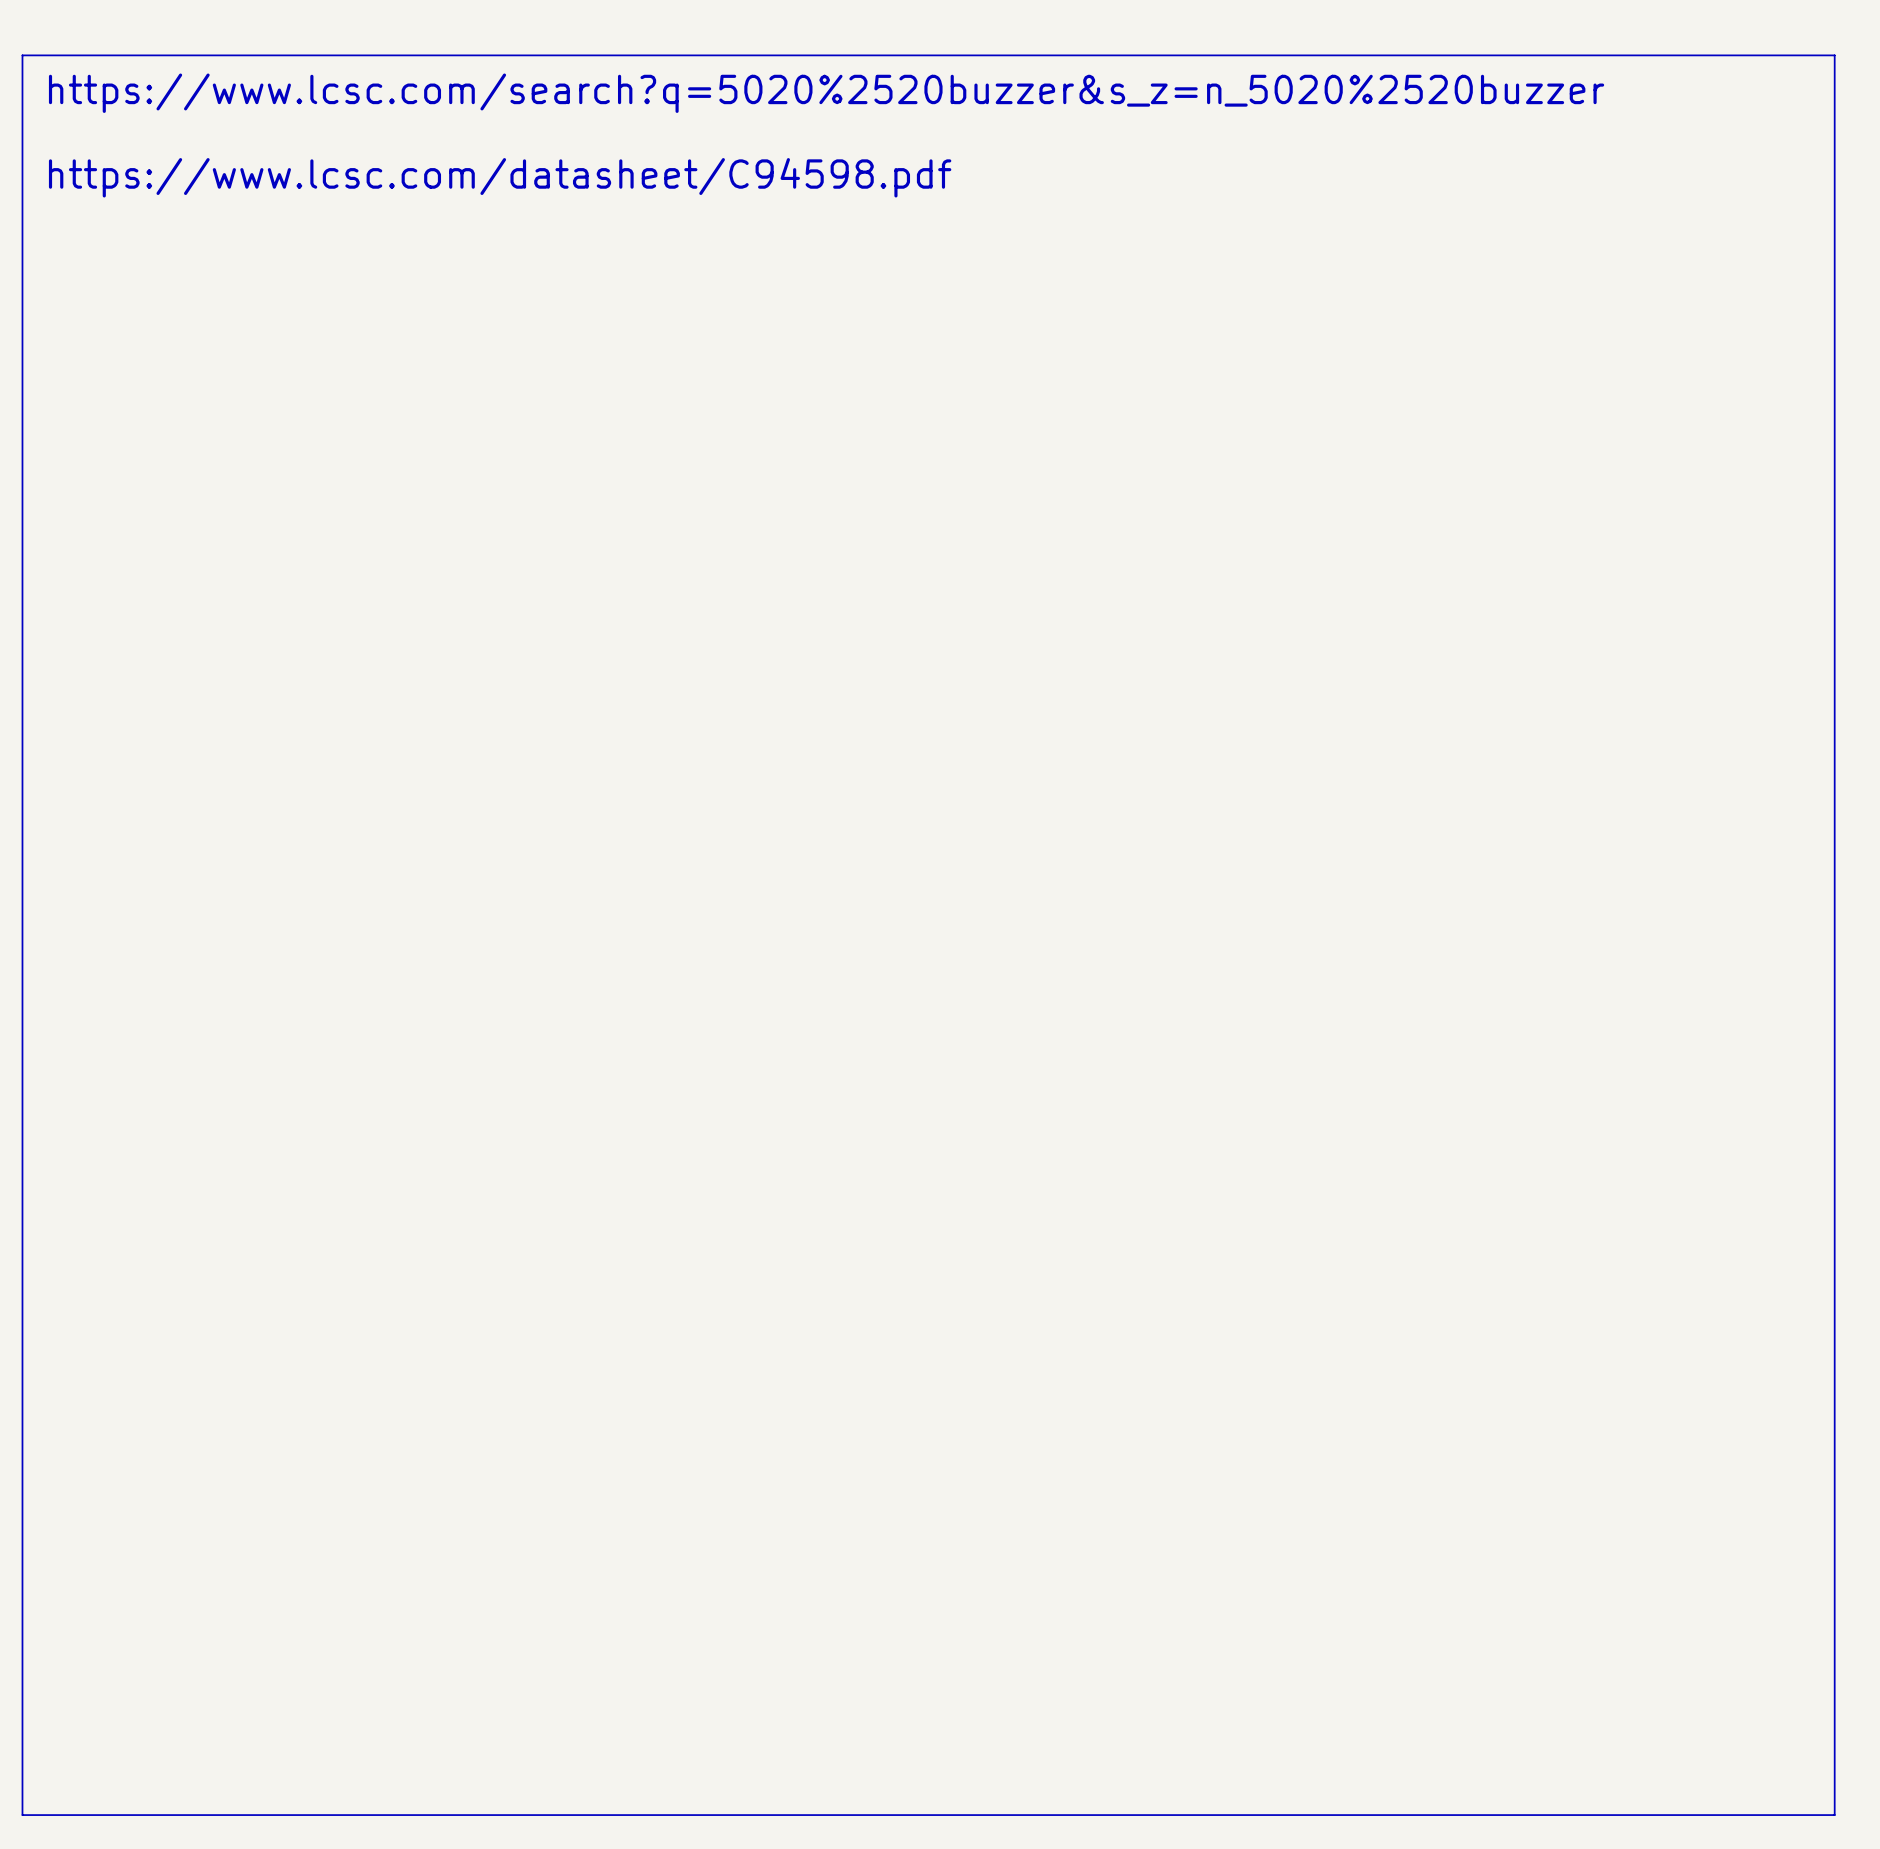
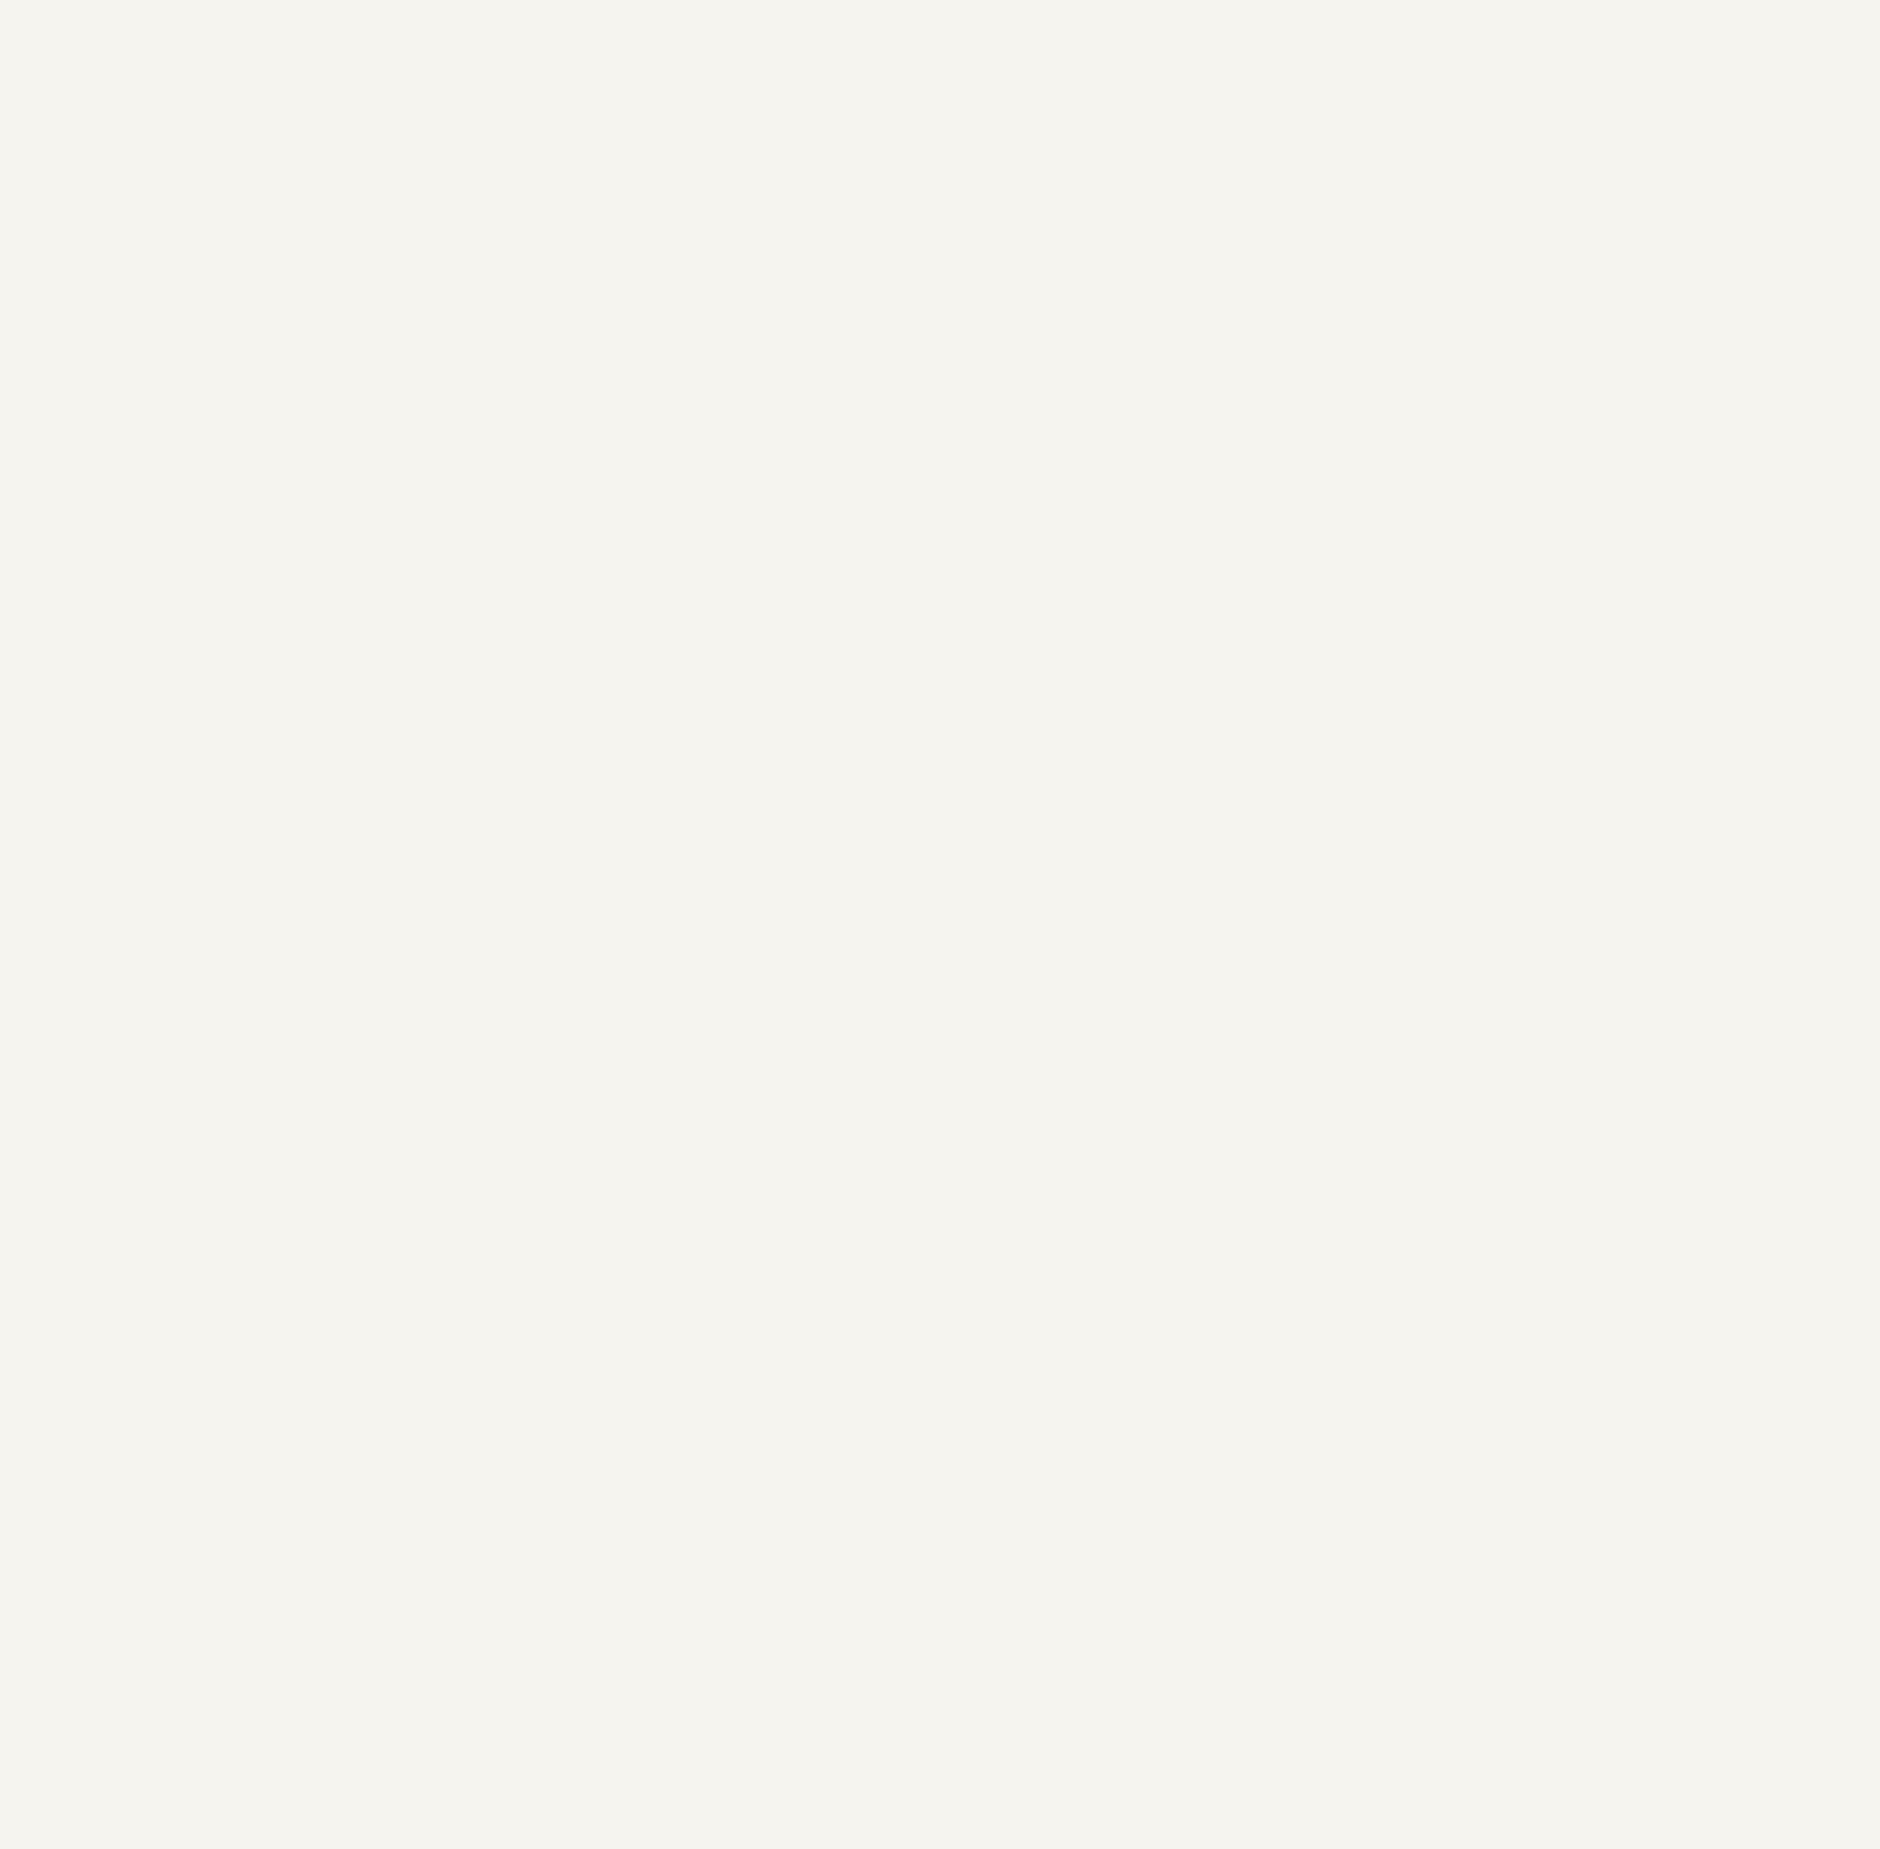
line: (22, 55) (1834, 55) (1834, 1815) (22, 1815) (22, 55) -> none
text: https://www.lcsc.com/search?q=5020%2520buzzer&s_z=n_5020%2520buzzer (826, 93) -> none
text: https://www.lcsc.com/datasheet/C94598.pdf (500, 177) -> none

